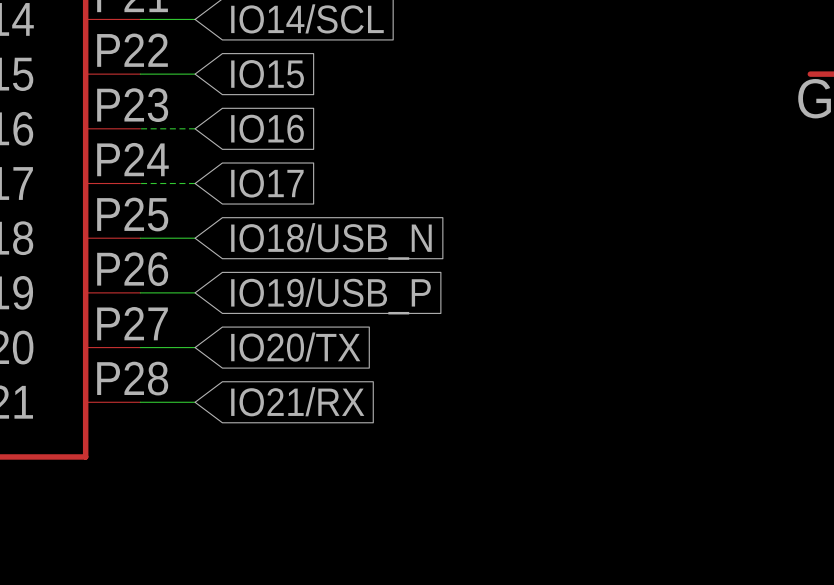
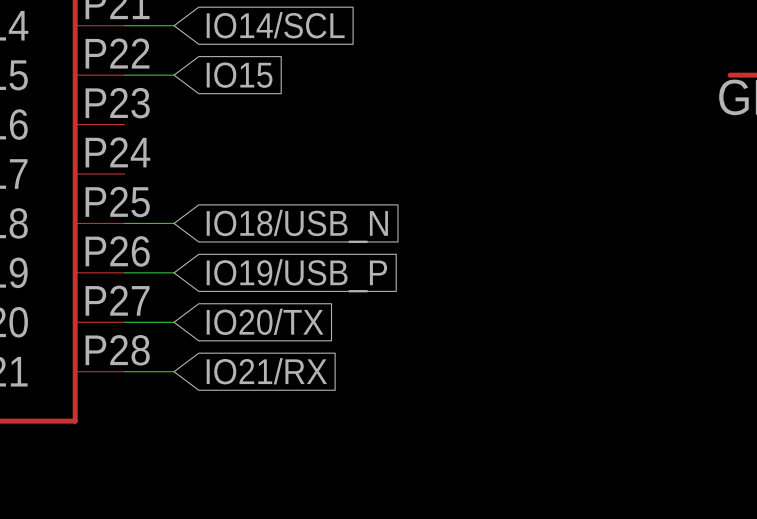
wire: (140, 128) (195, 128) -> none
global label: IO16 (267, 128) -> none
wire: (140, 183) (195, 183) -> none
global label: IO17 (267, 183) -> none

